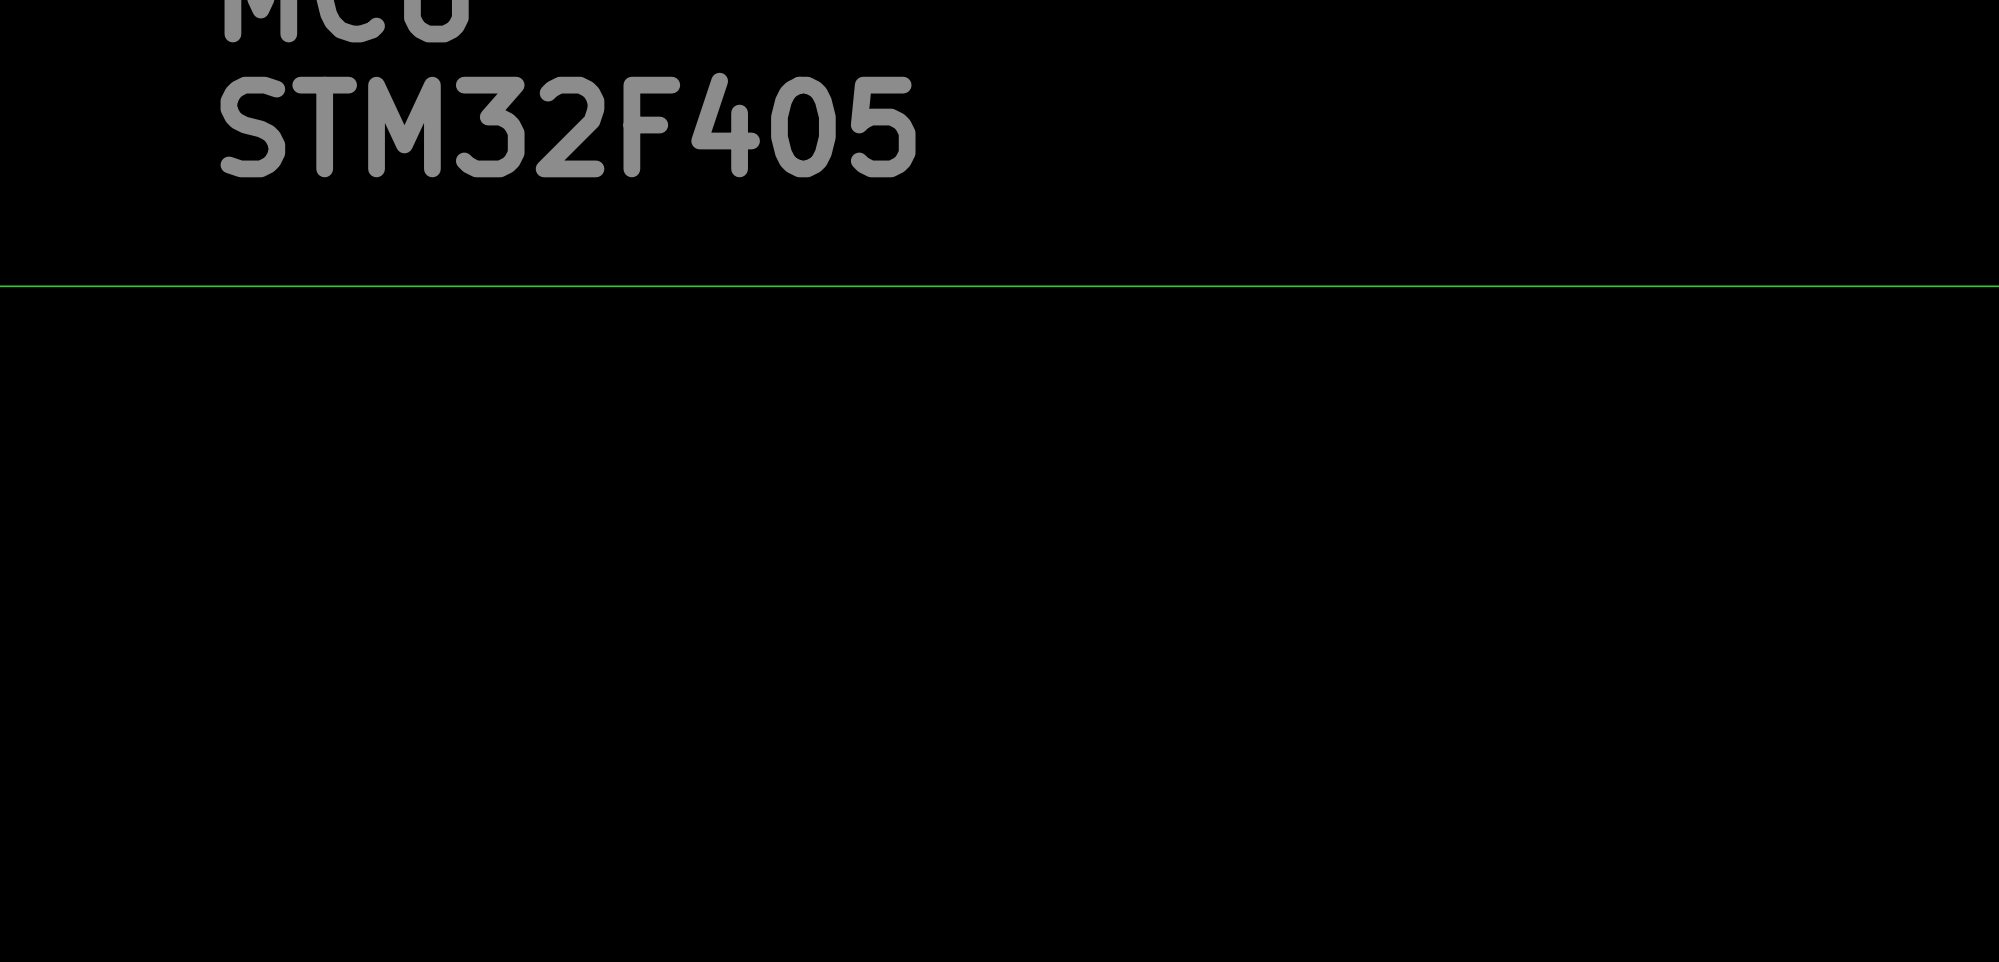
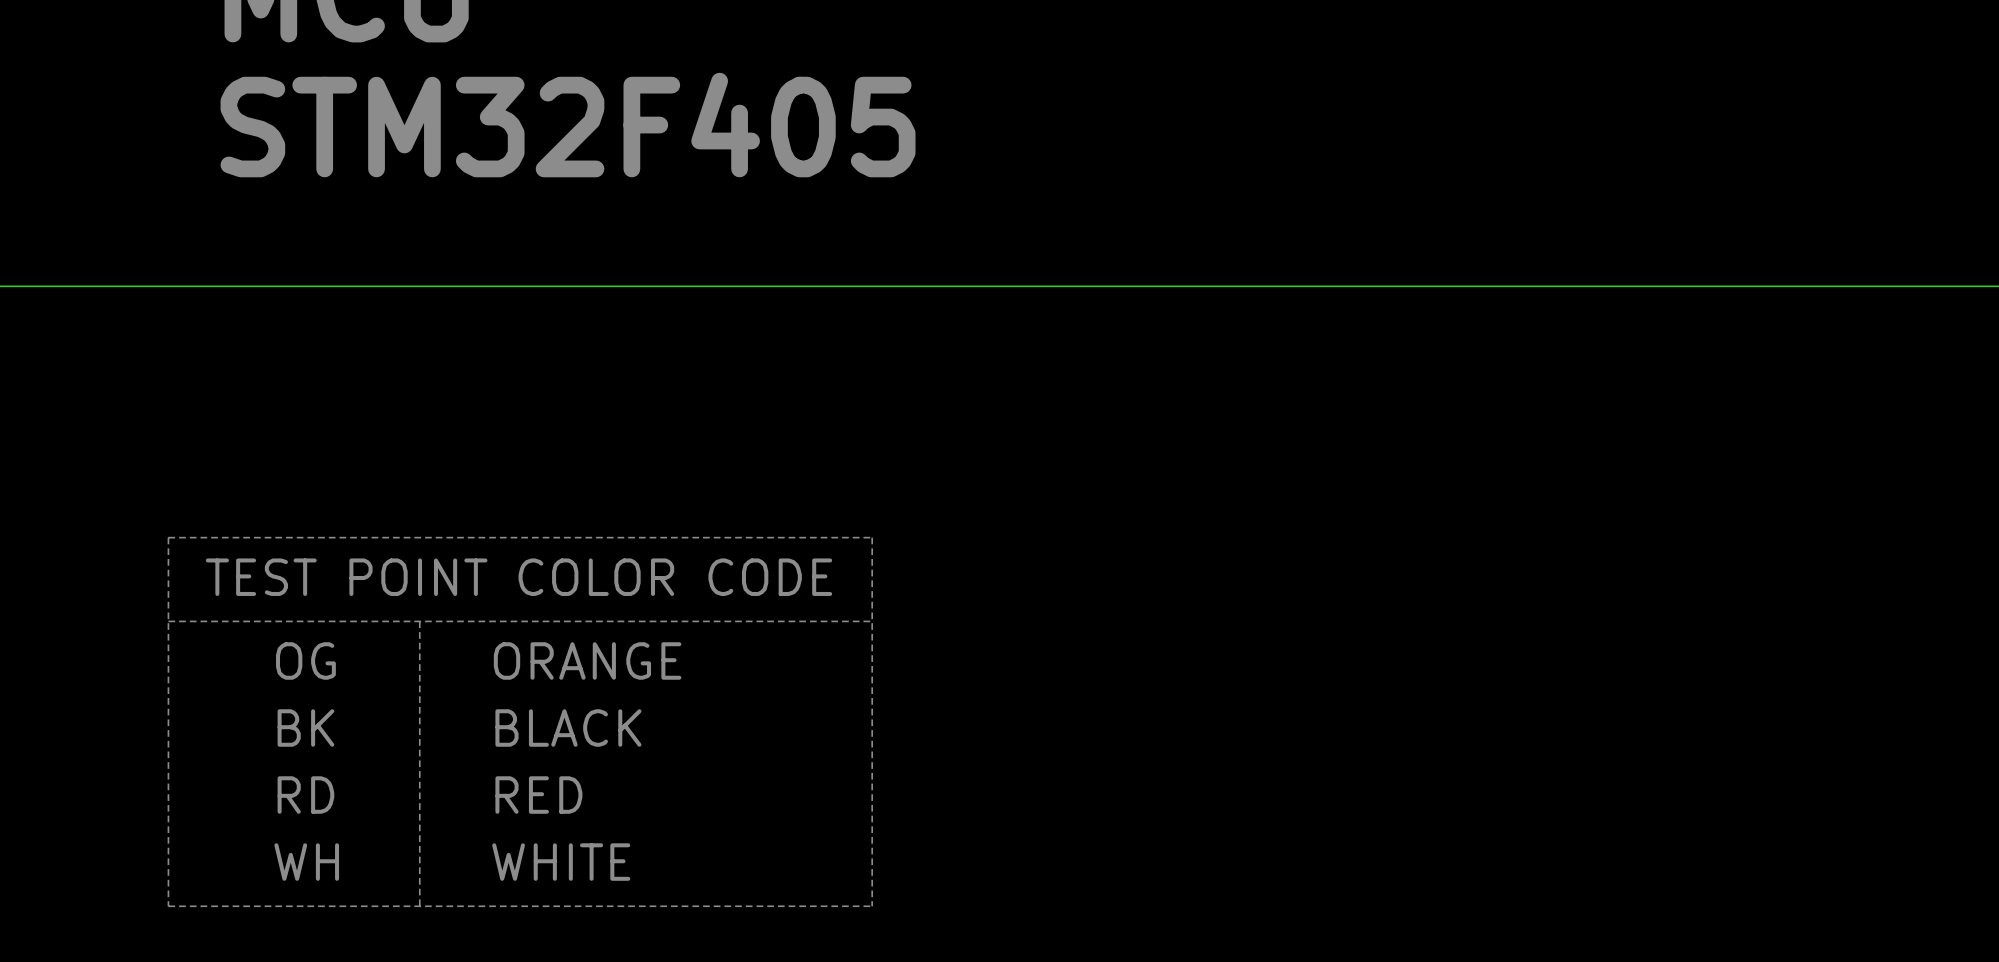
line: none -> (168, 537) (168, 906) (872, 906) (872, 537) (168, 537)
text: none -> TEST POINT COLOR CODE (518, 577)
line: none -> (168, 621) (872, 621)
line: none -> (419, 621) (419, 906)
text: none -> OG (305, 660)
text: none -> ORANGE (587, 660)
text: none -> BK (305, 728)
text: none -> BLACK (568, 728)
text: none -> RD (305, 795)
text: none -> RED (538, 795)
text: none -> WH (306, 862)
text: none -> WHITE (561, 862)

